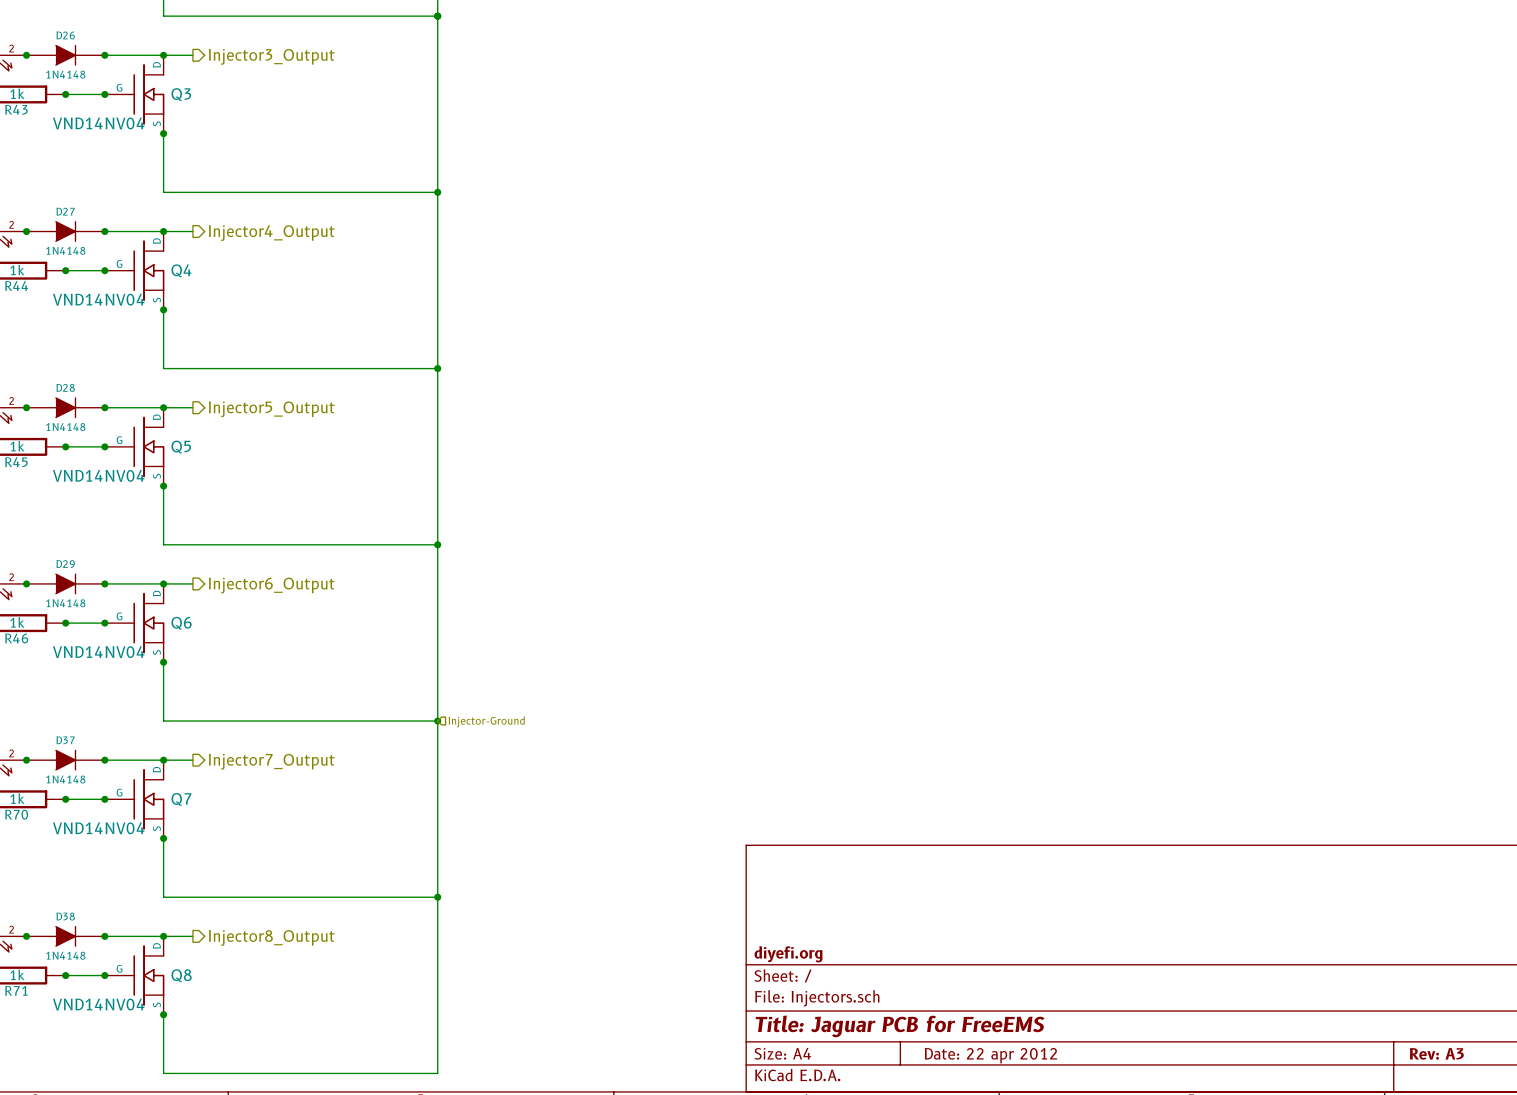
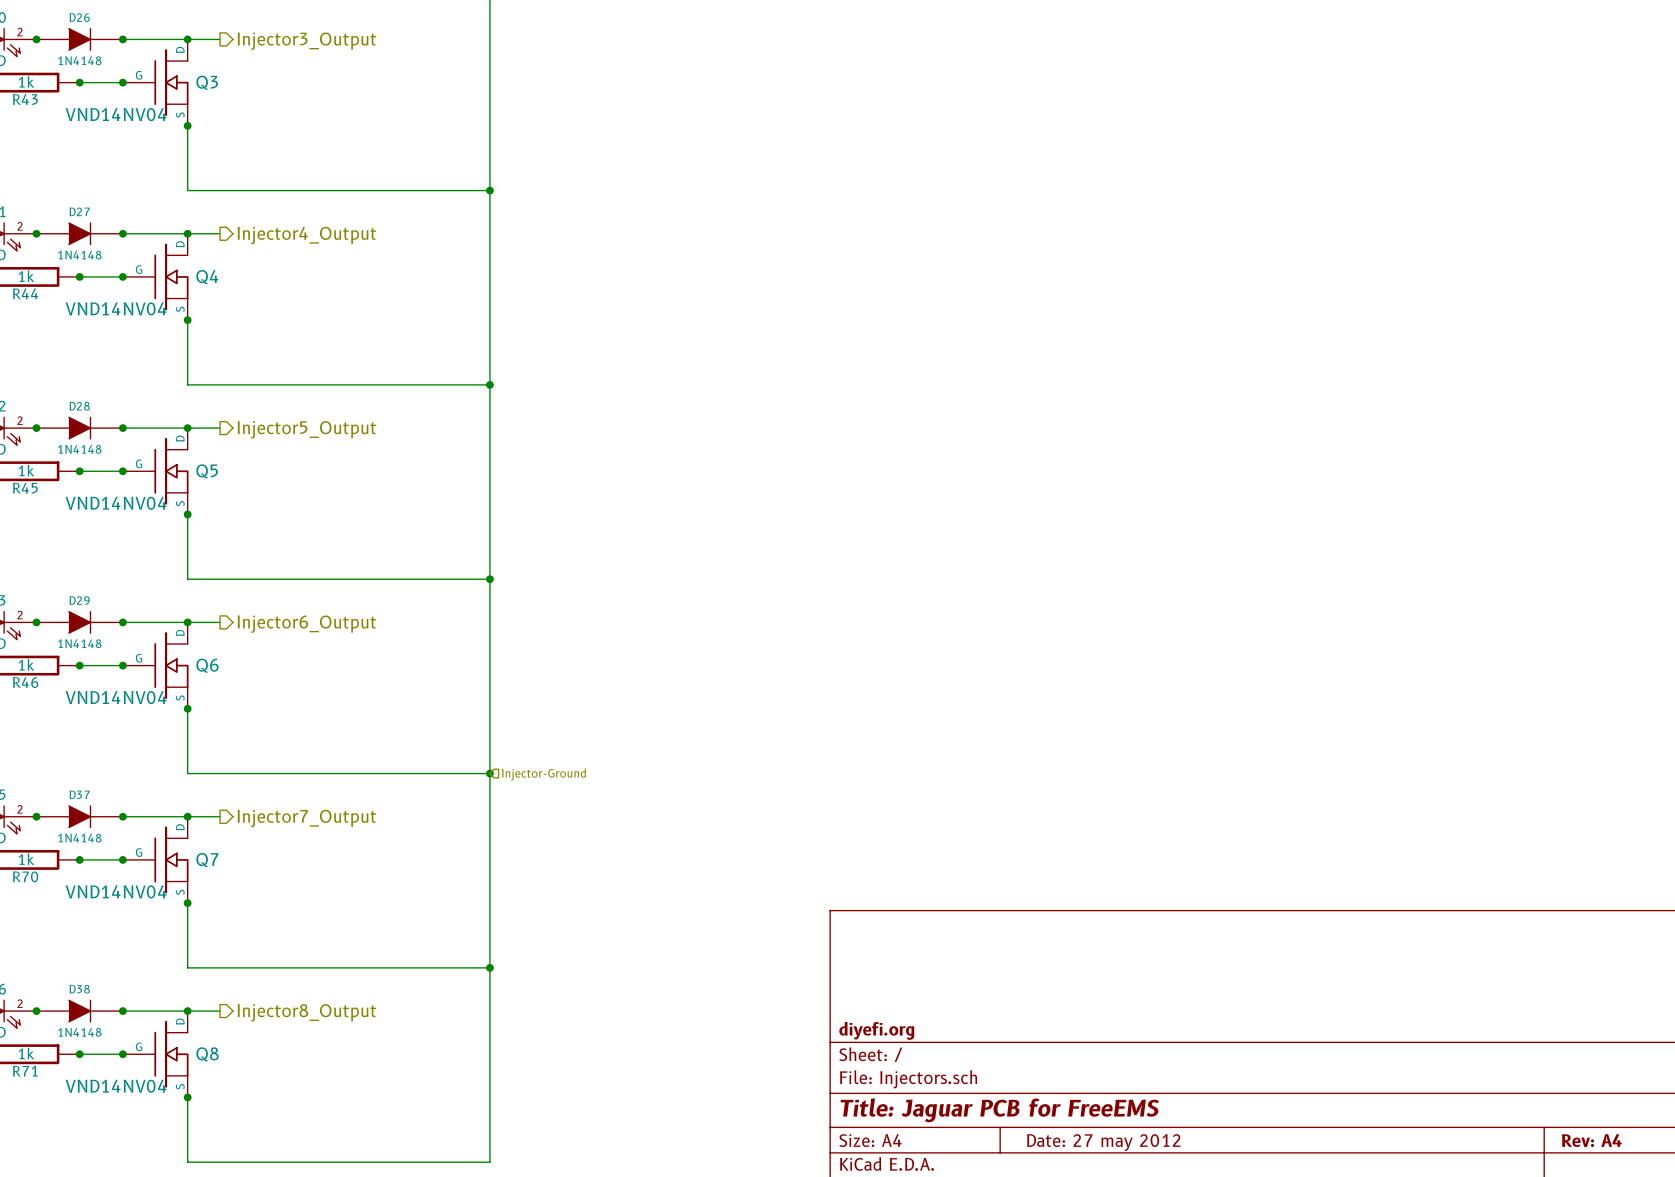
title block: Rev: A3 (1436, 1053) -> Rev: A4 (1591, 1140)
title block: Date: 22 apr 2012 (990, 1055) -> Date: 27 may 2012 (1103, 1142)

